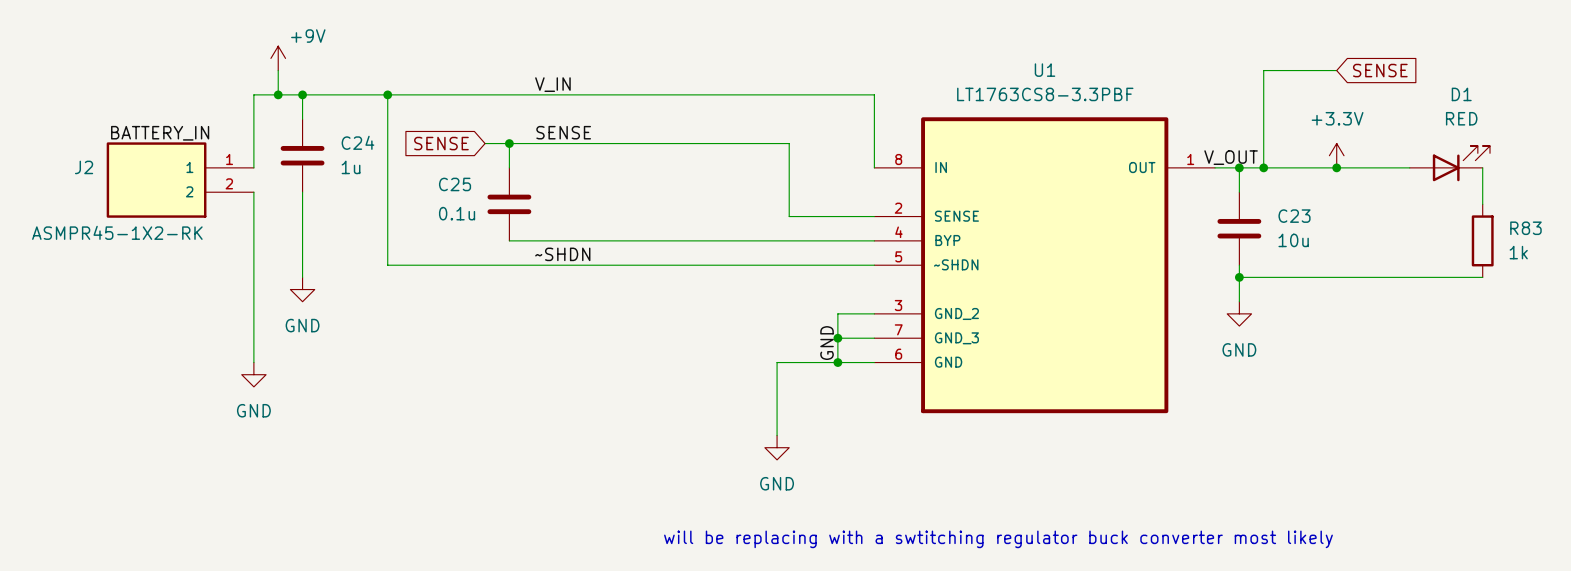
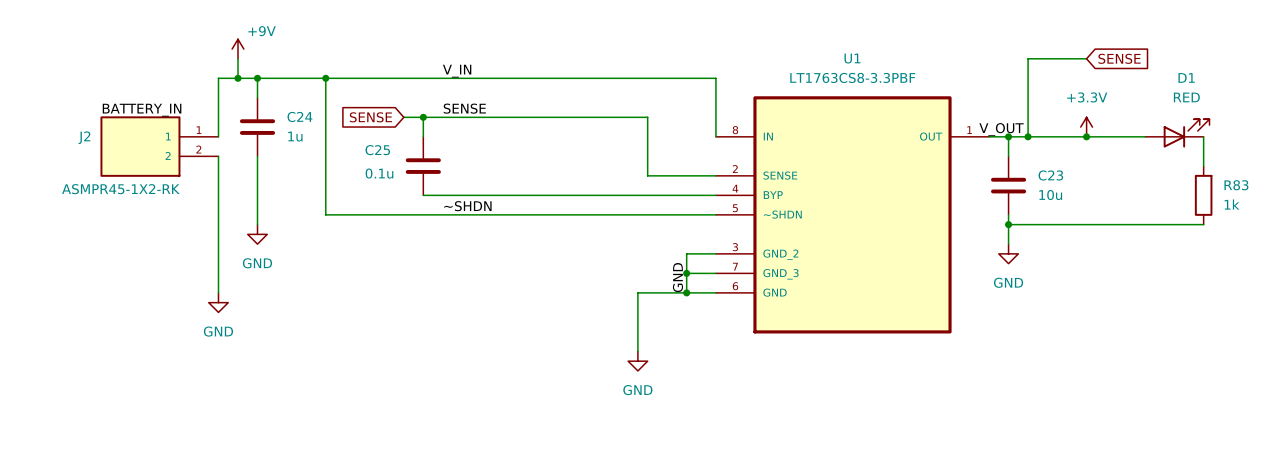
text: will be replacing with a swtitching regulator buck converter most likely (998, 539) -> none

